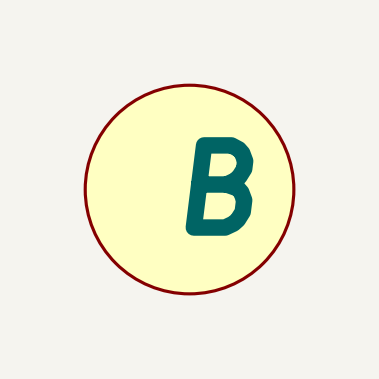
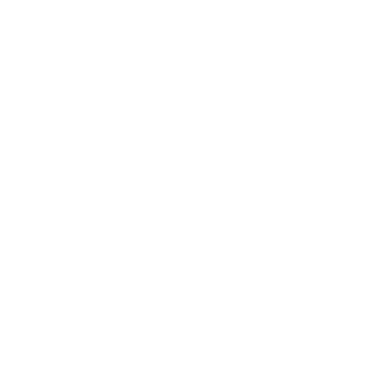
part: B (189, 189) -> none

